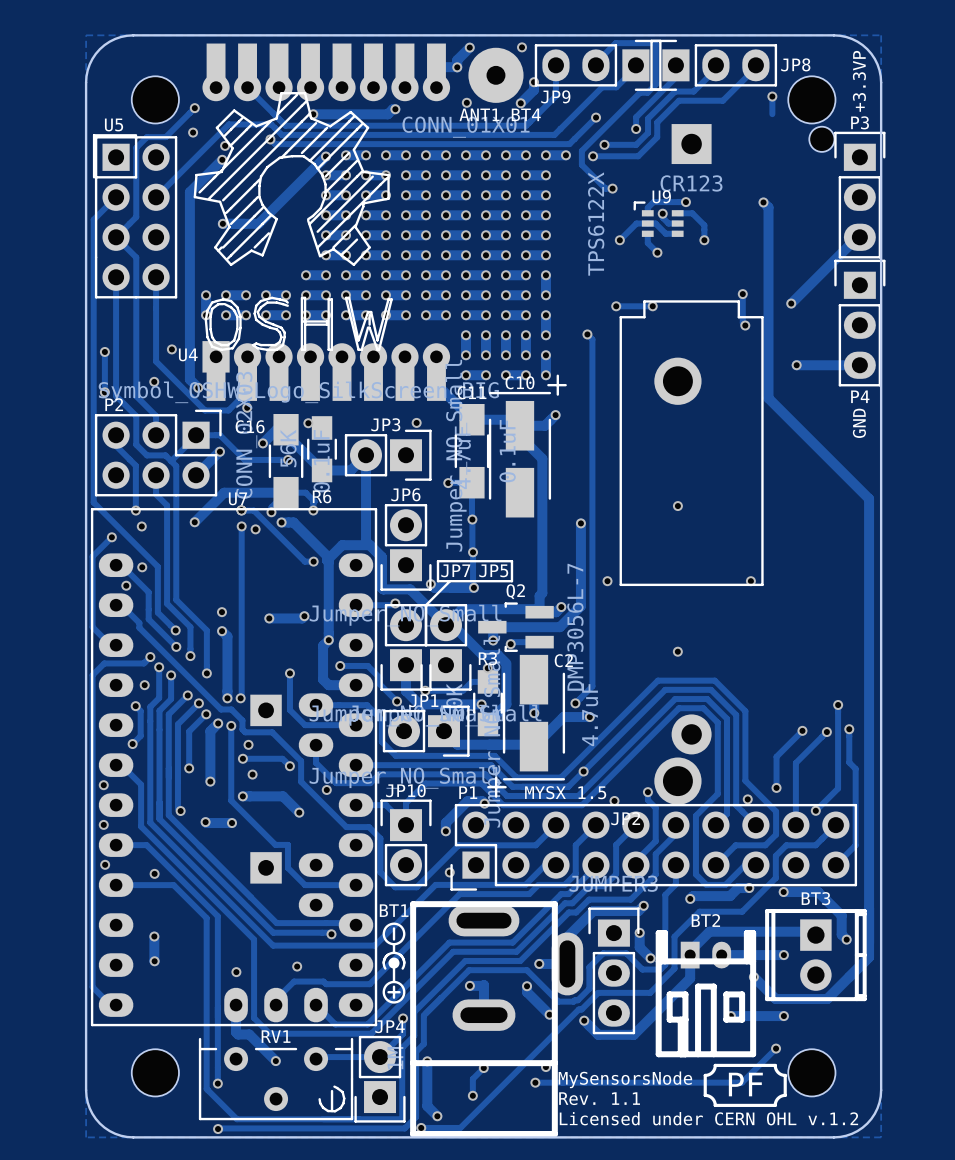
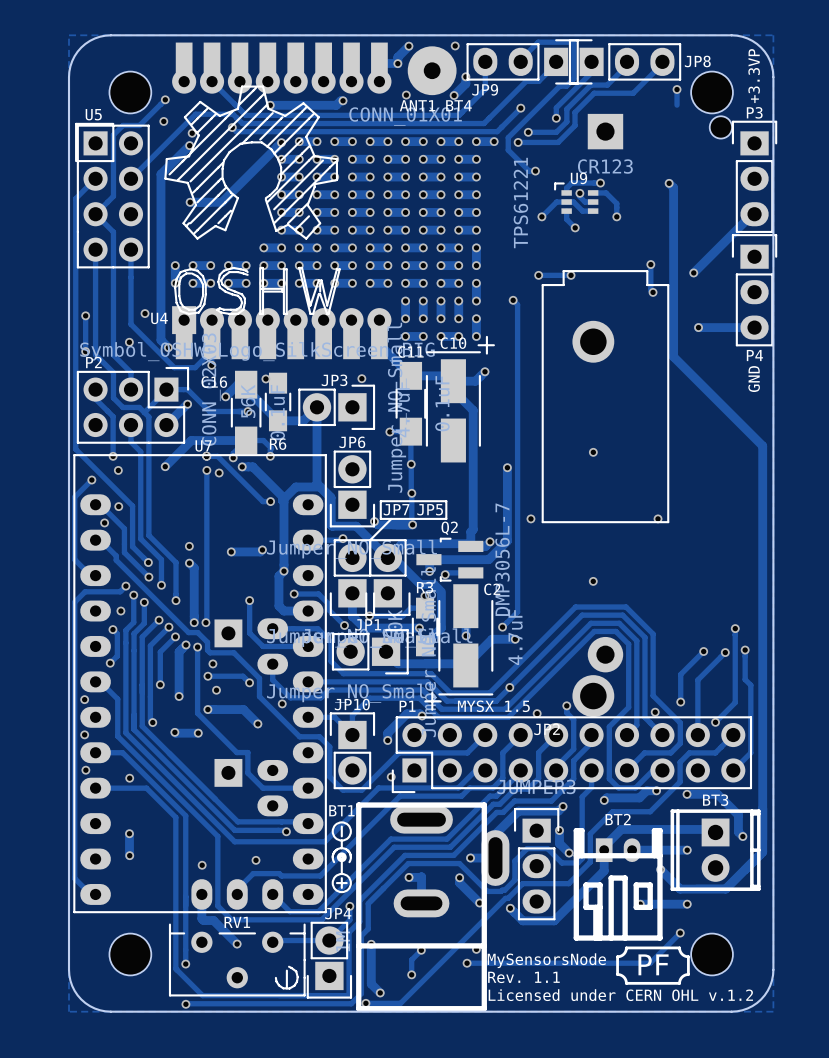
U9 value: TPS6122X (596, 224) -> TPS61221 (520, 203)

